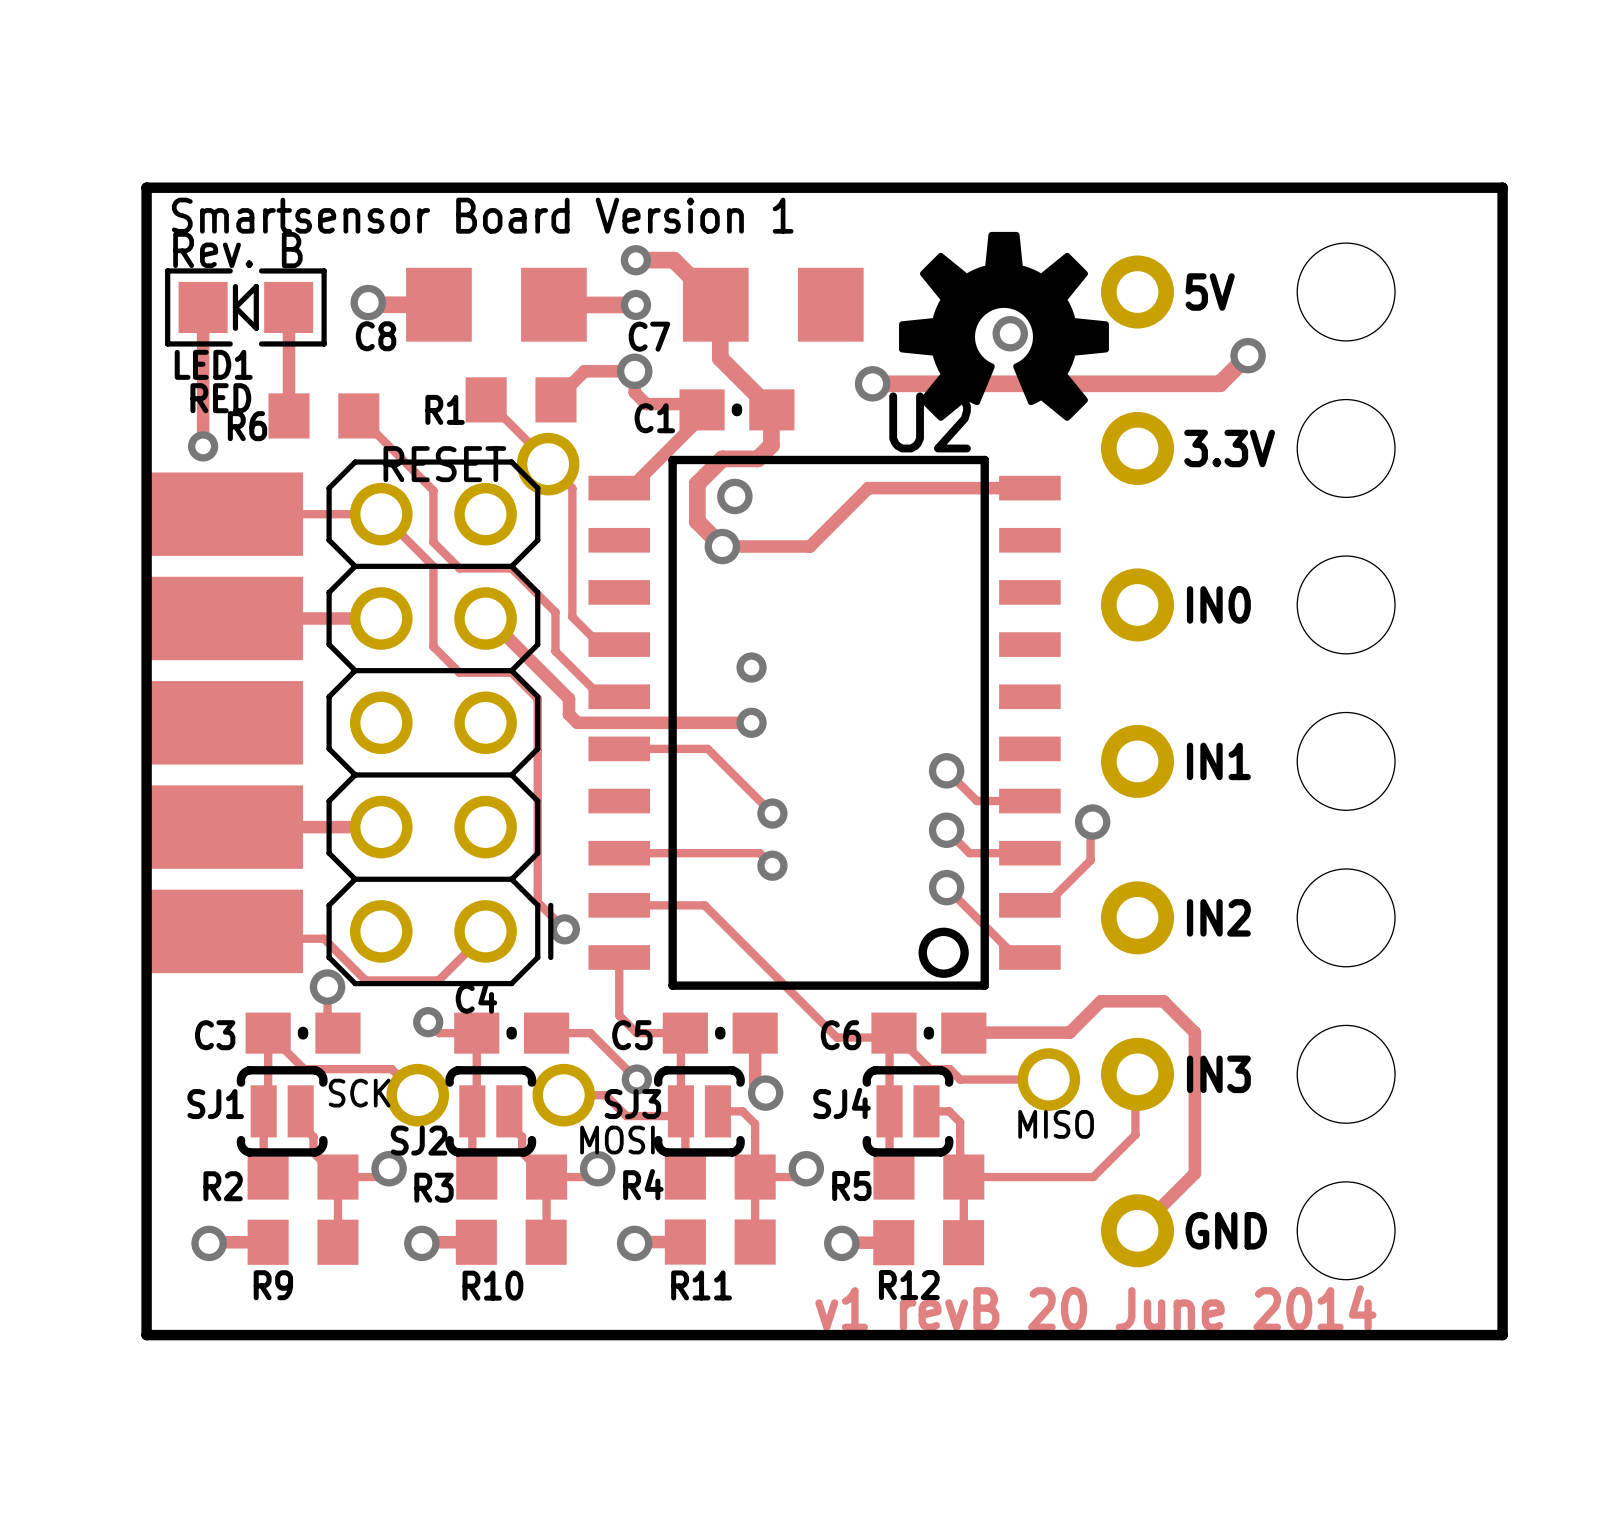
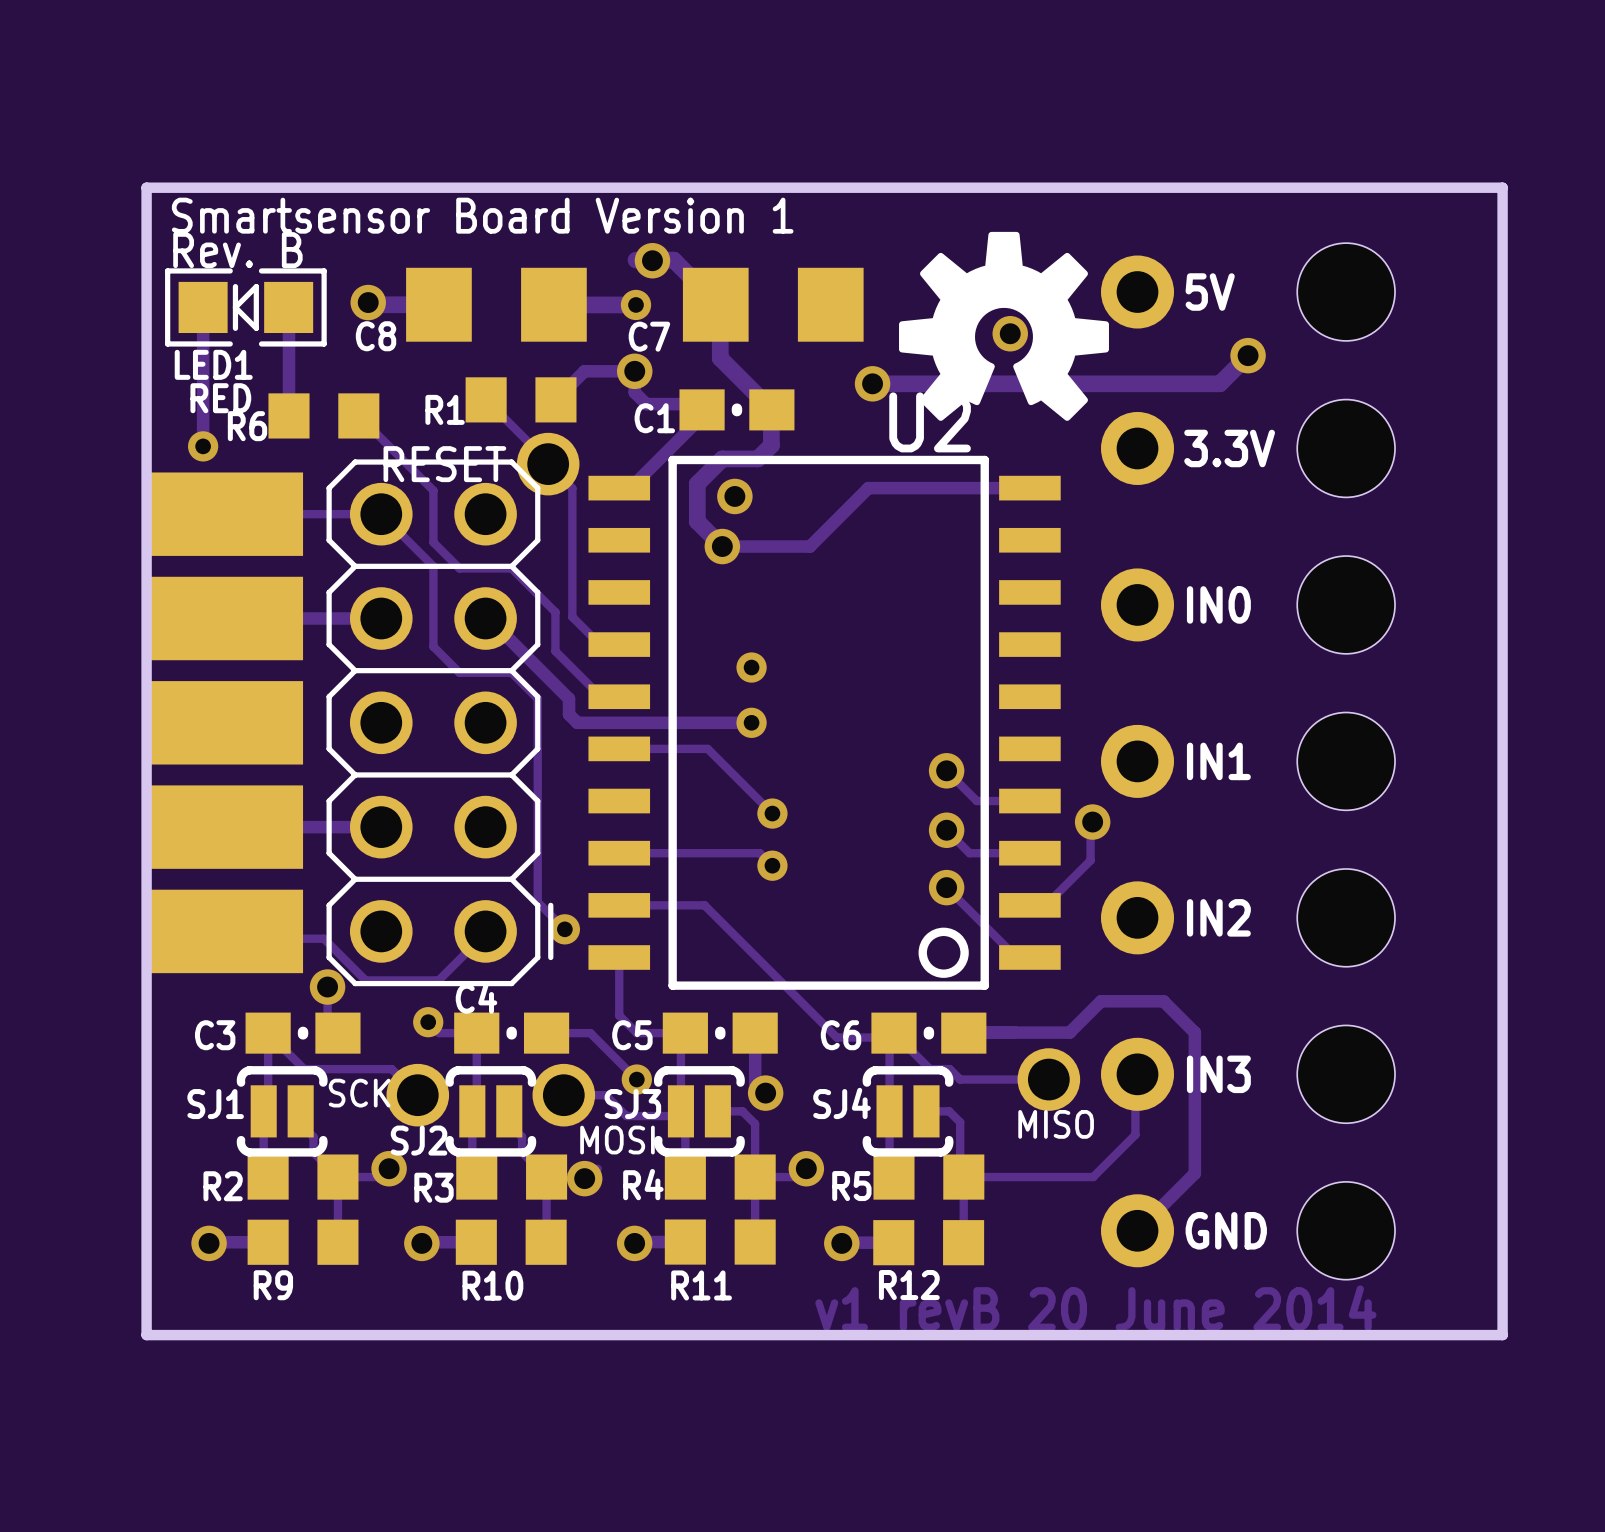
via position: (635, 260) -> (652, 260)
via position: (597, 1168) -> (584, 1178)

